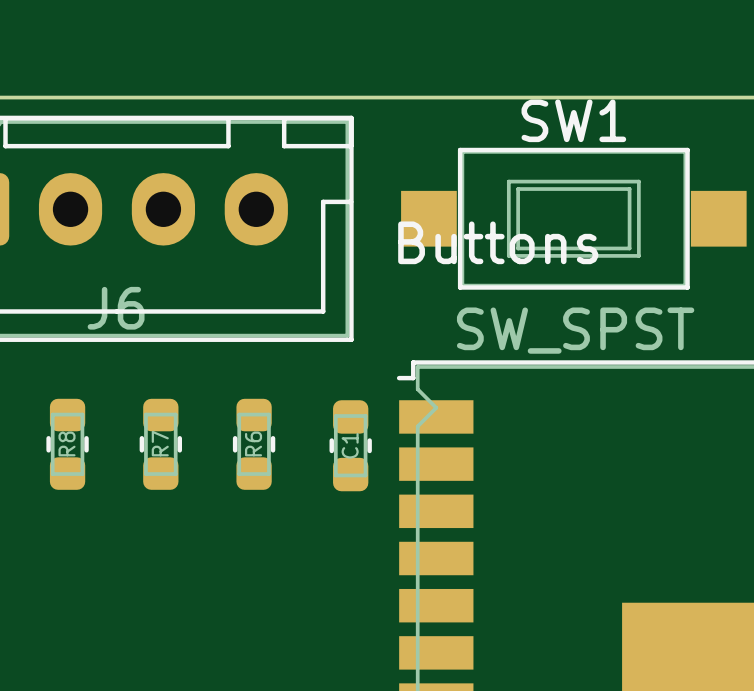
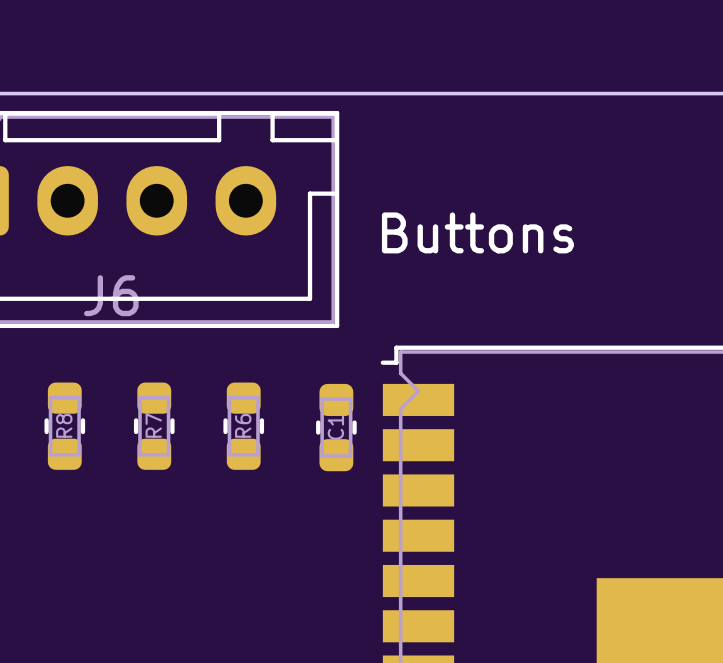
SW1: SW_SPST (573, 218) -> none

